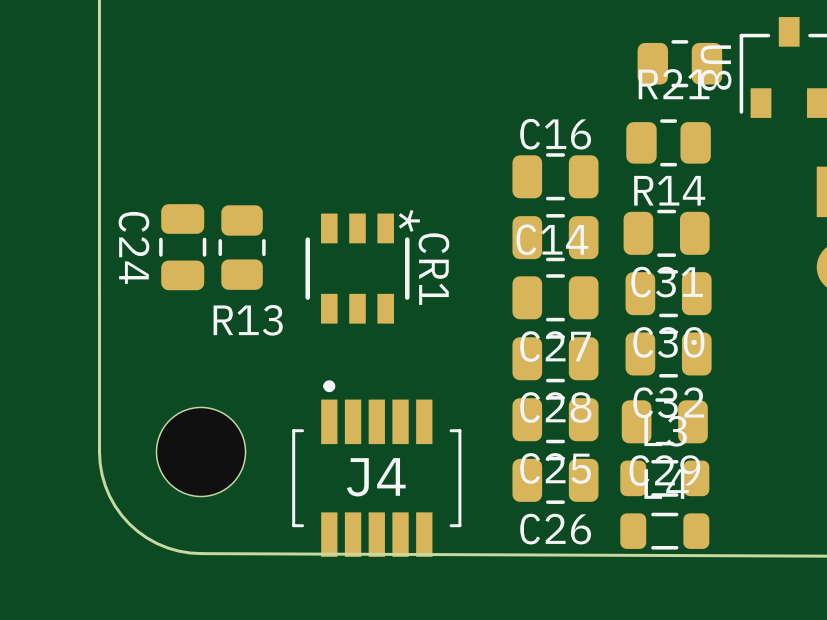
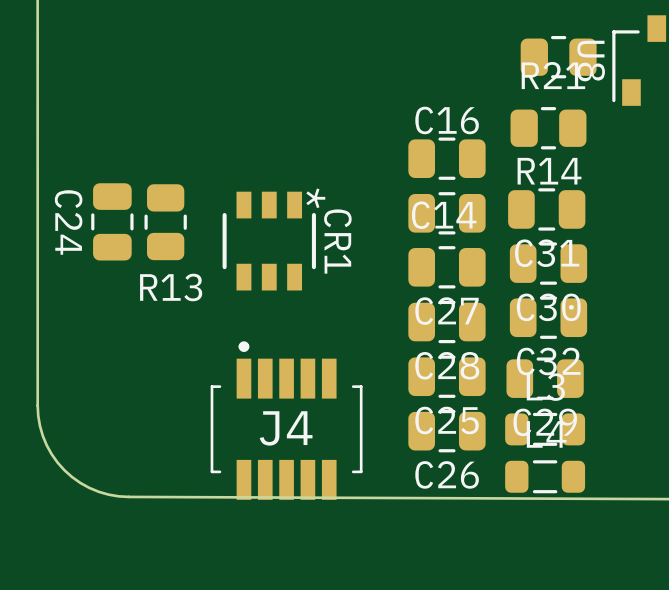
part: (201, 451) -> none

